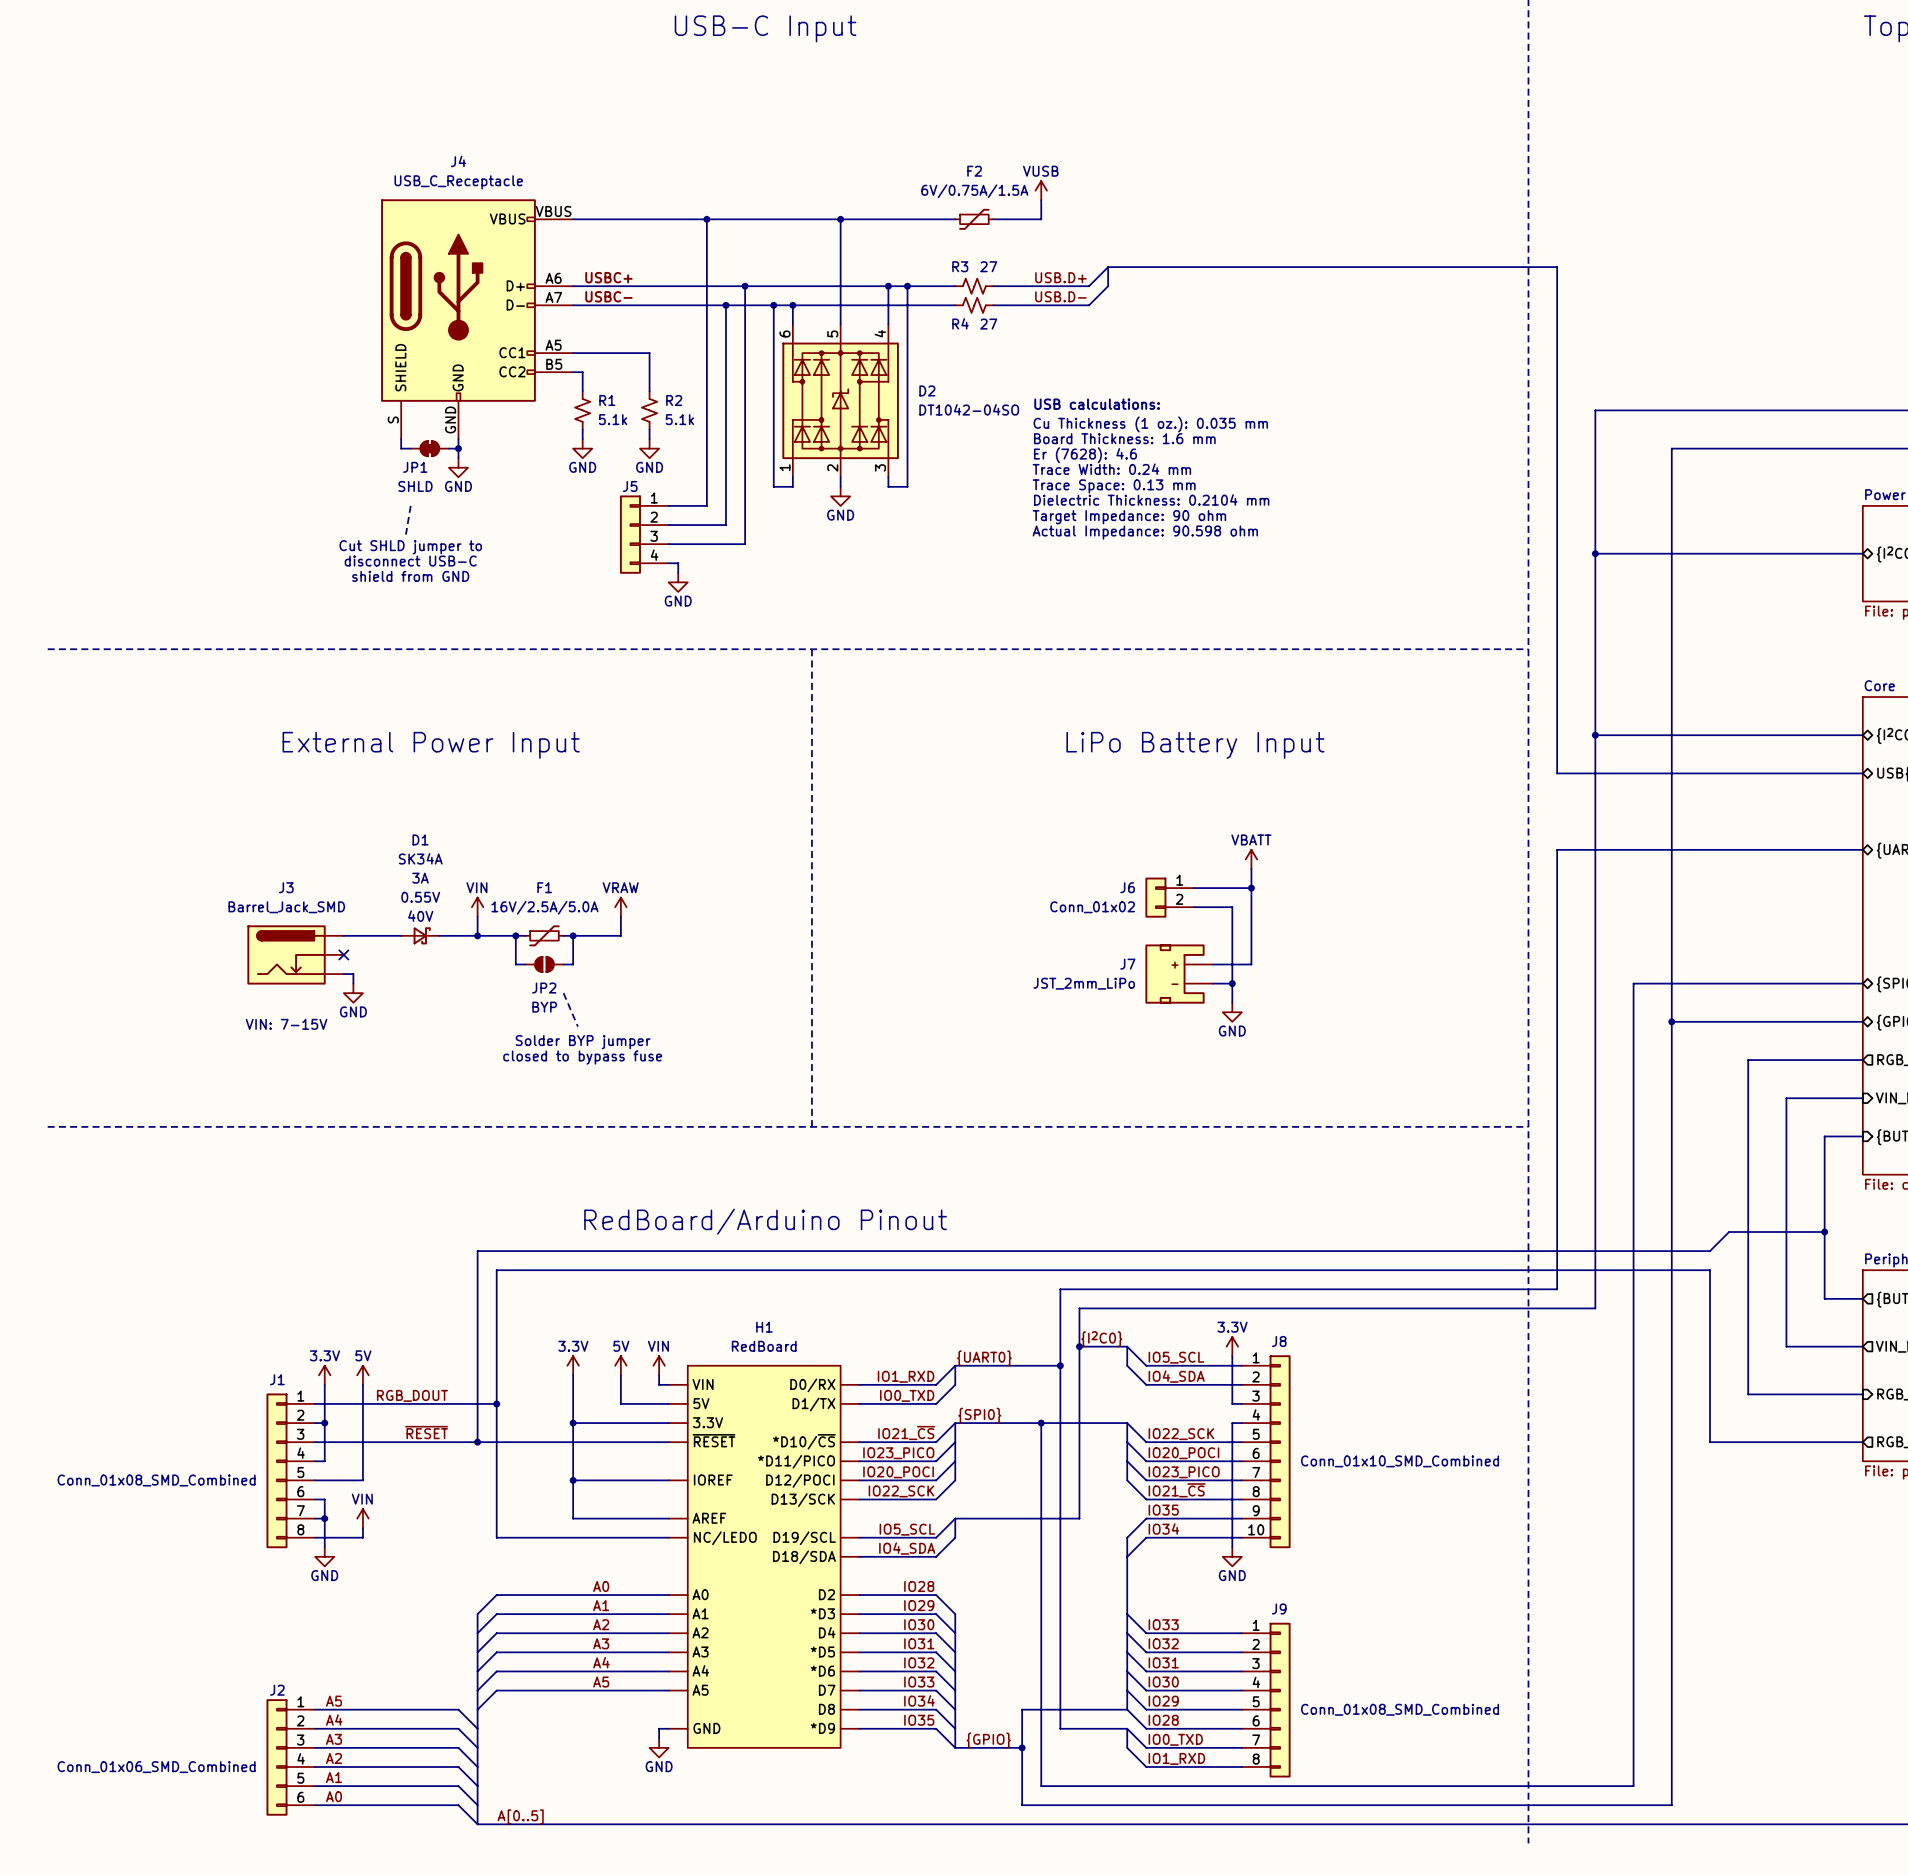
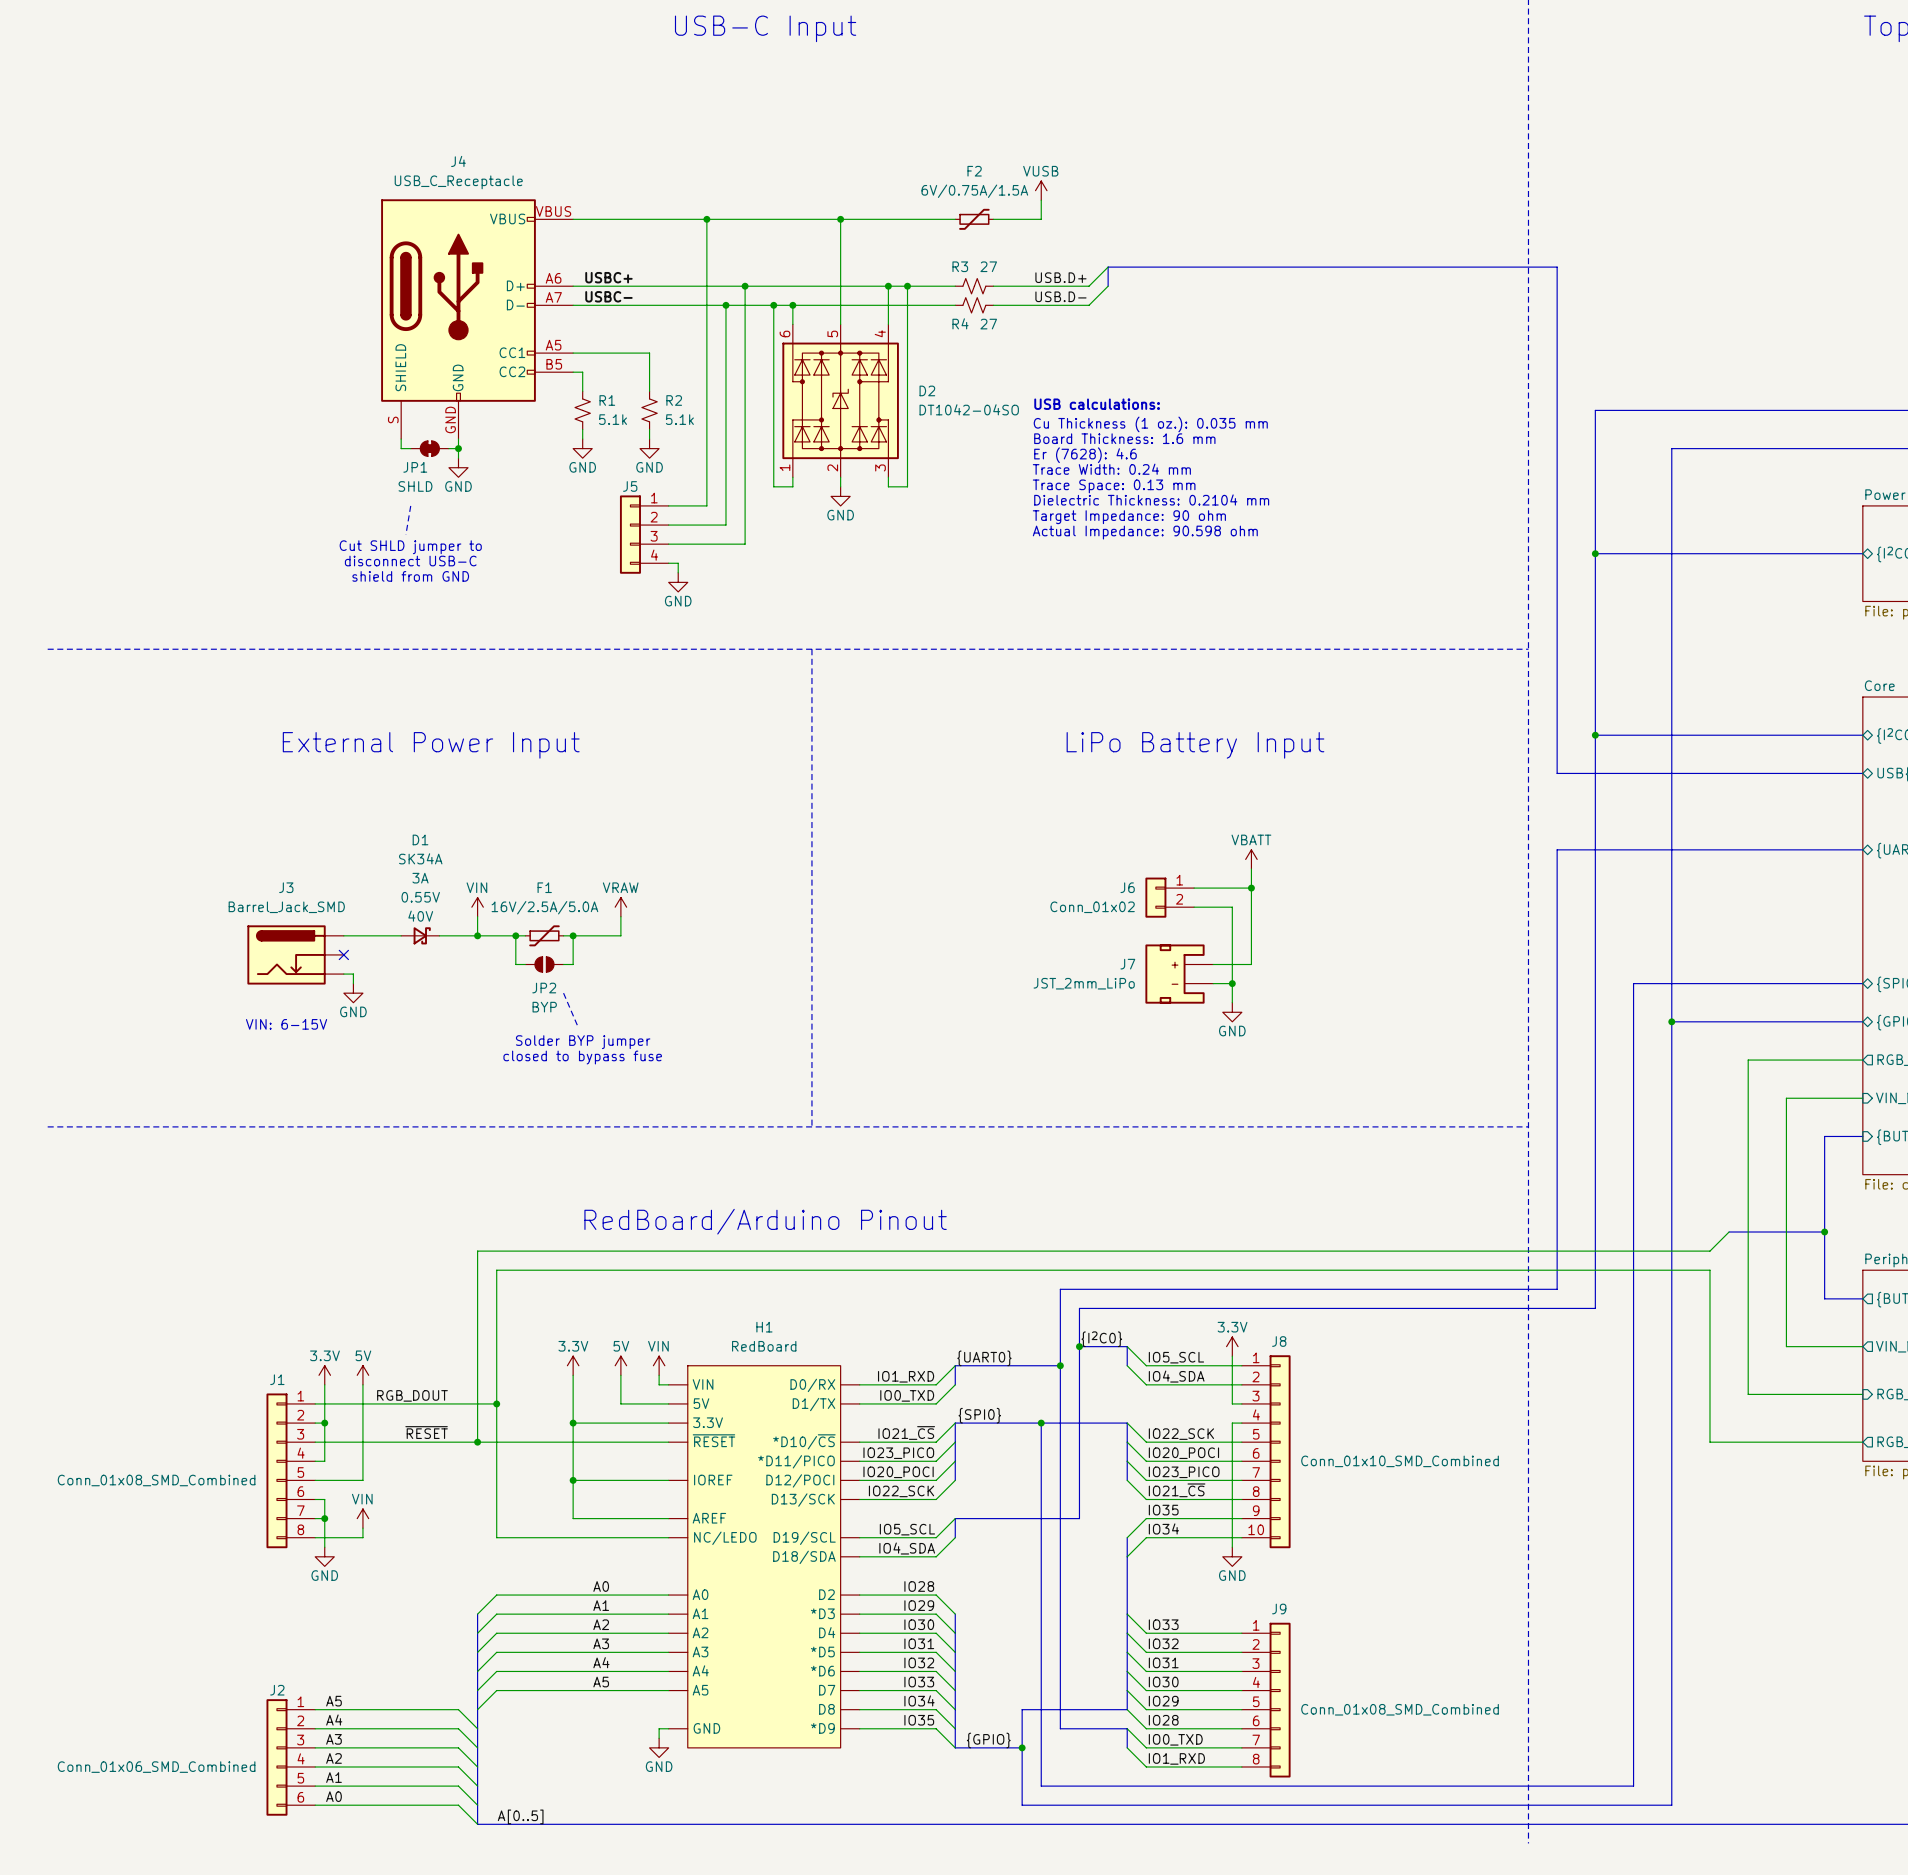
text: VIN: 7-15V (286, 1024) -> VIN: 6-15V (286, 1024)

